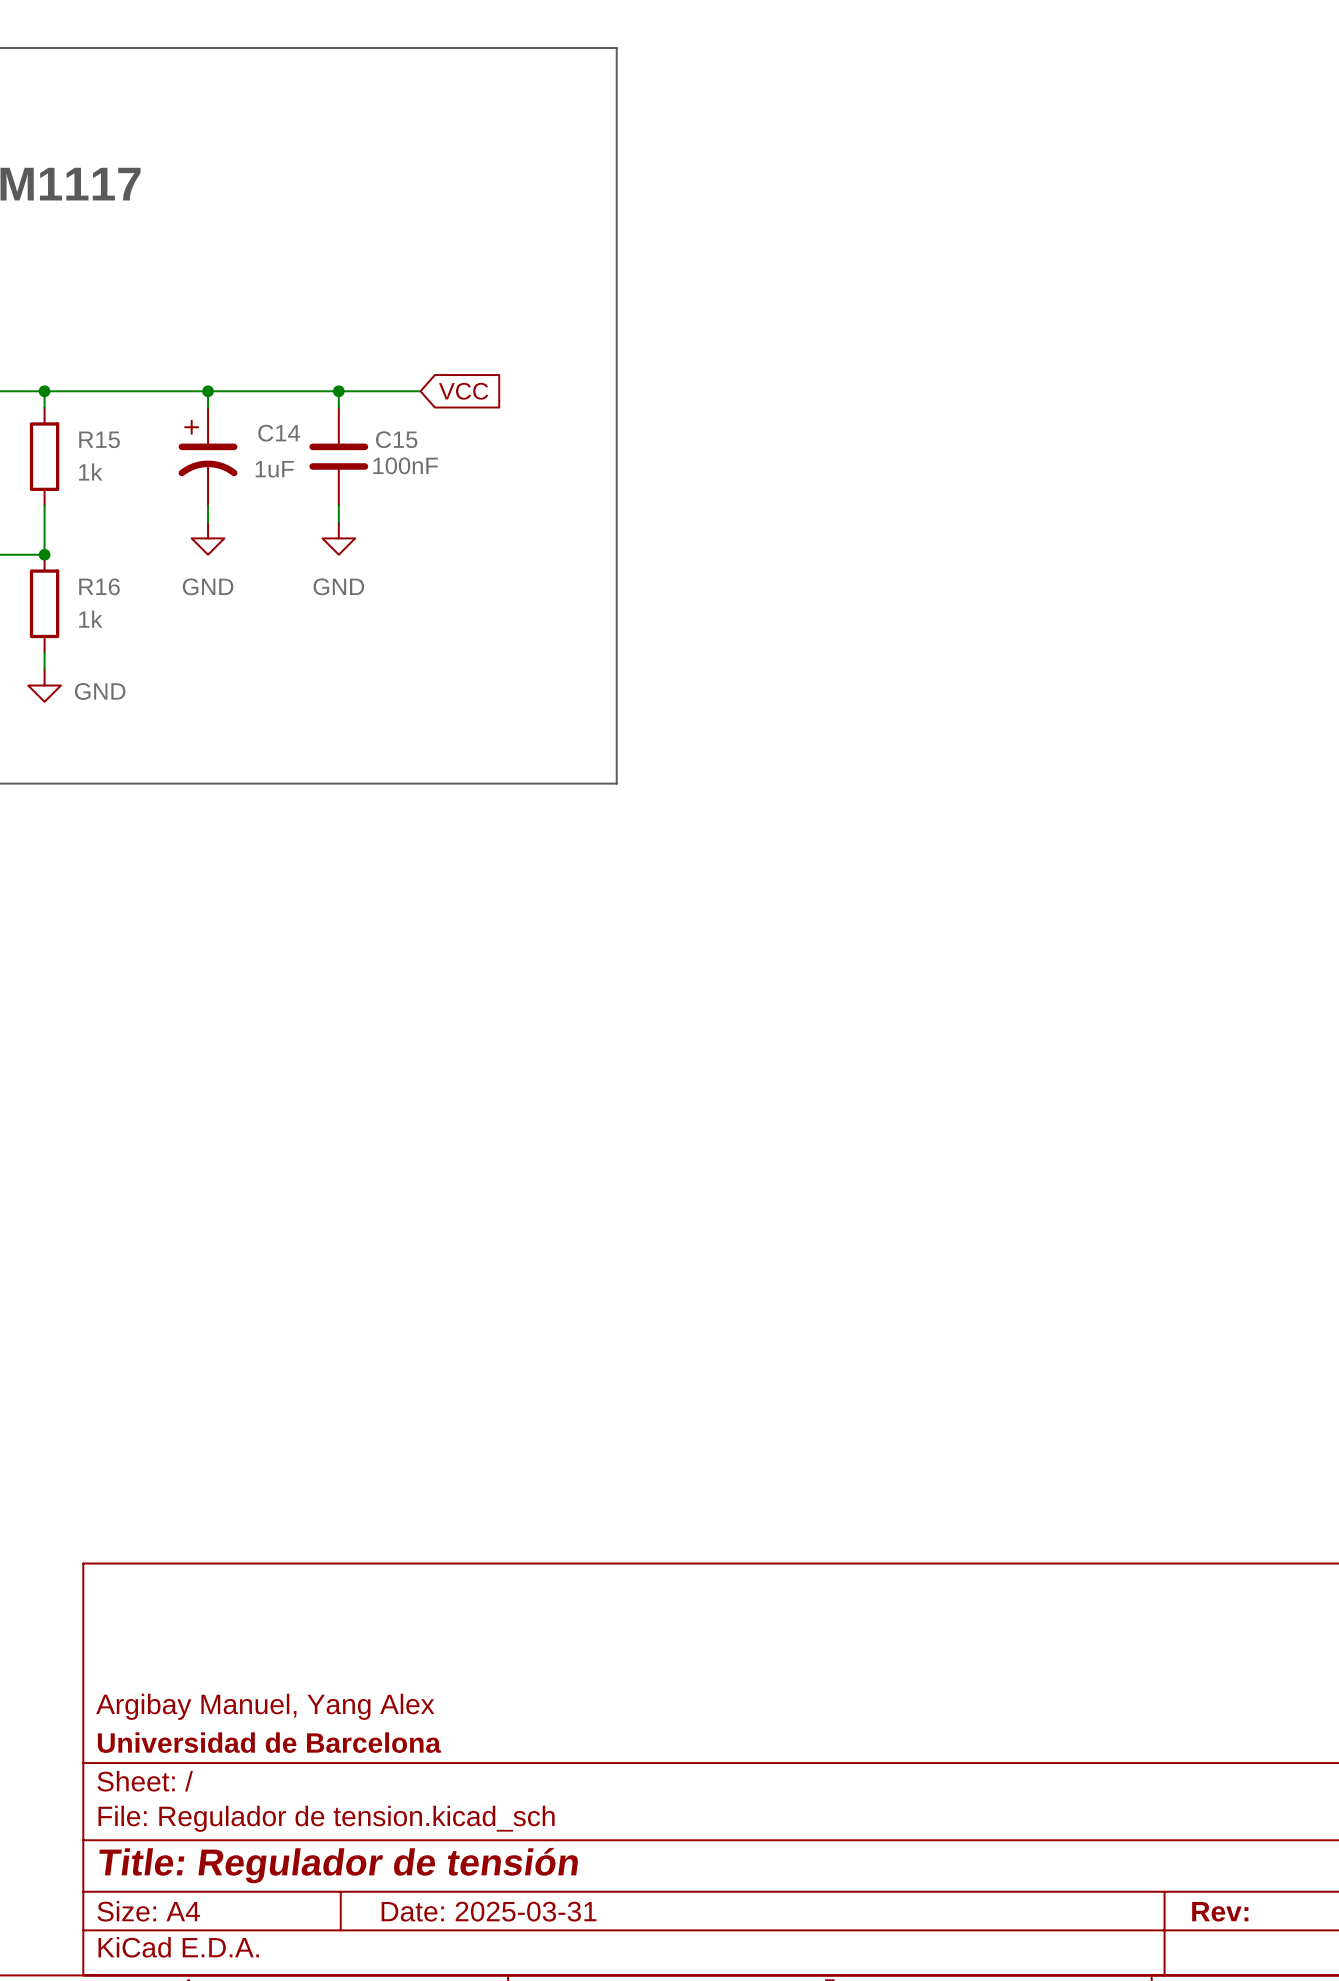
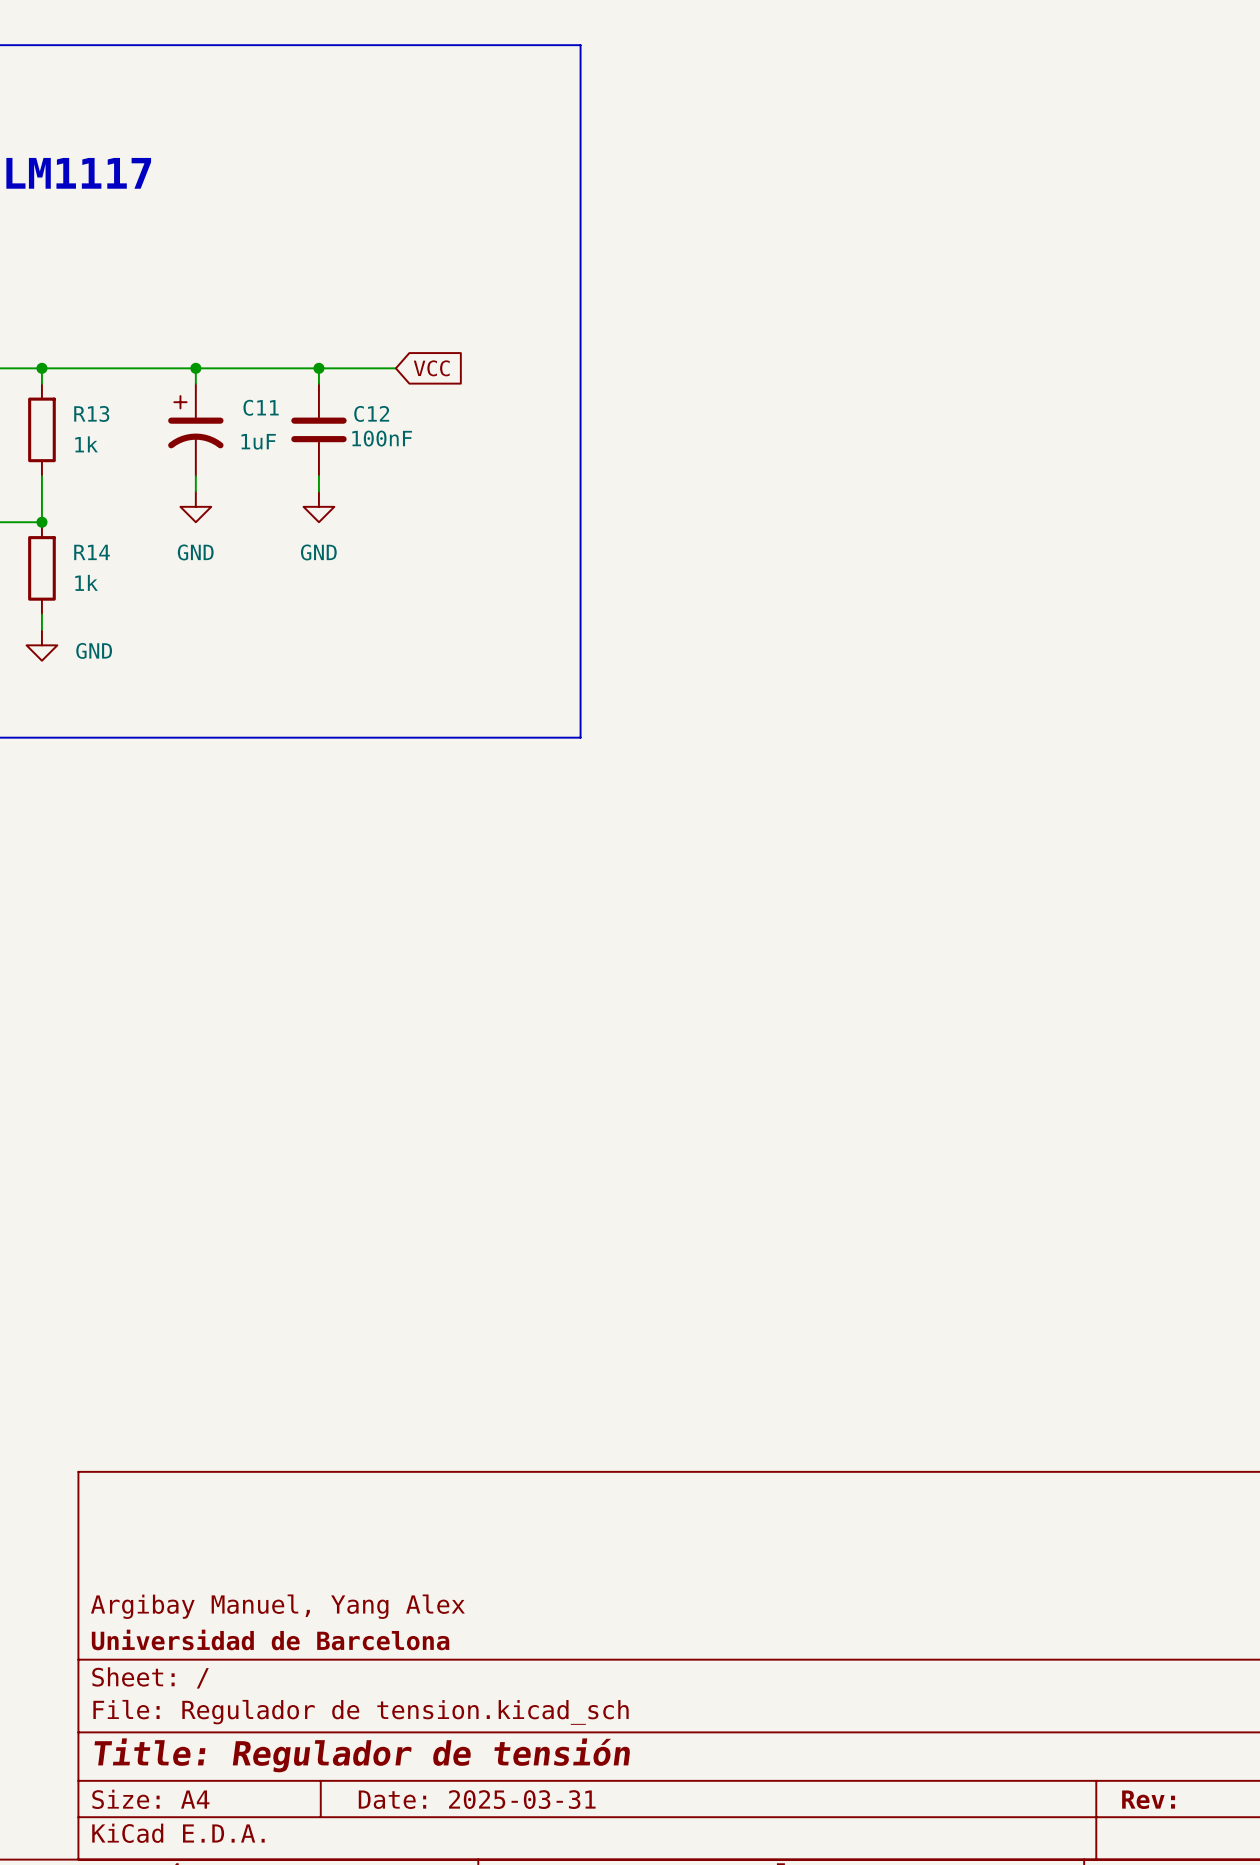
C14 name: C14 (279, 433) -> C11 (261, 407)
R15 name: R15 (99, 439) -> R13 (91, 413)
C15 name: C15 (396, 439) -> C12 (371, 413)
R16 name: R16 (99, 586) -> R14 (92, 552)

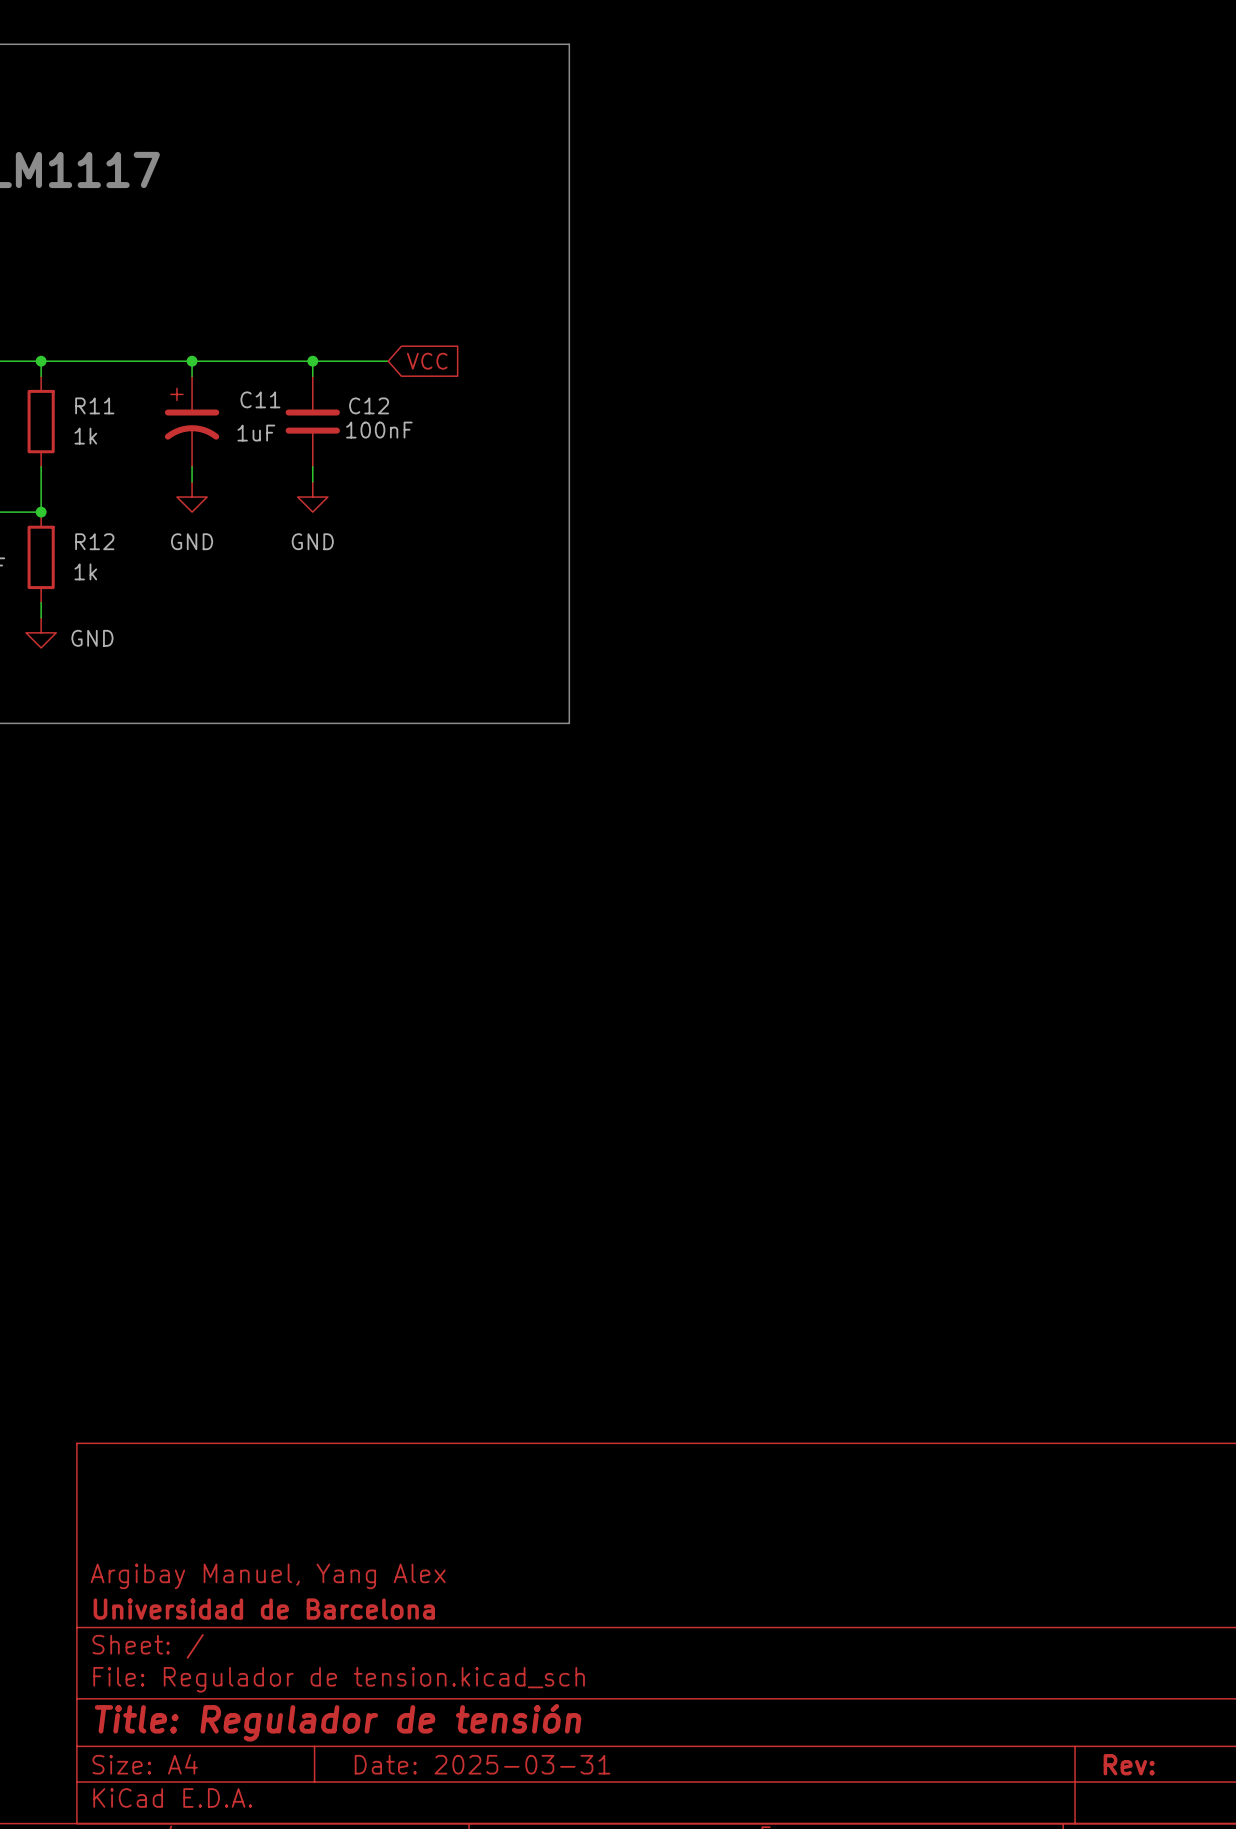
R13 name: R13 (91, 413) -> R11 (94, 405)
R14 name: R14 (92, 552) -> R12 (94, 541)

